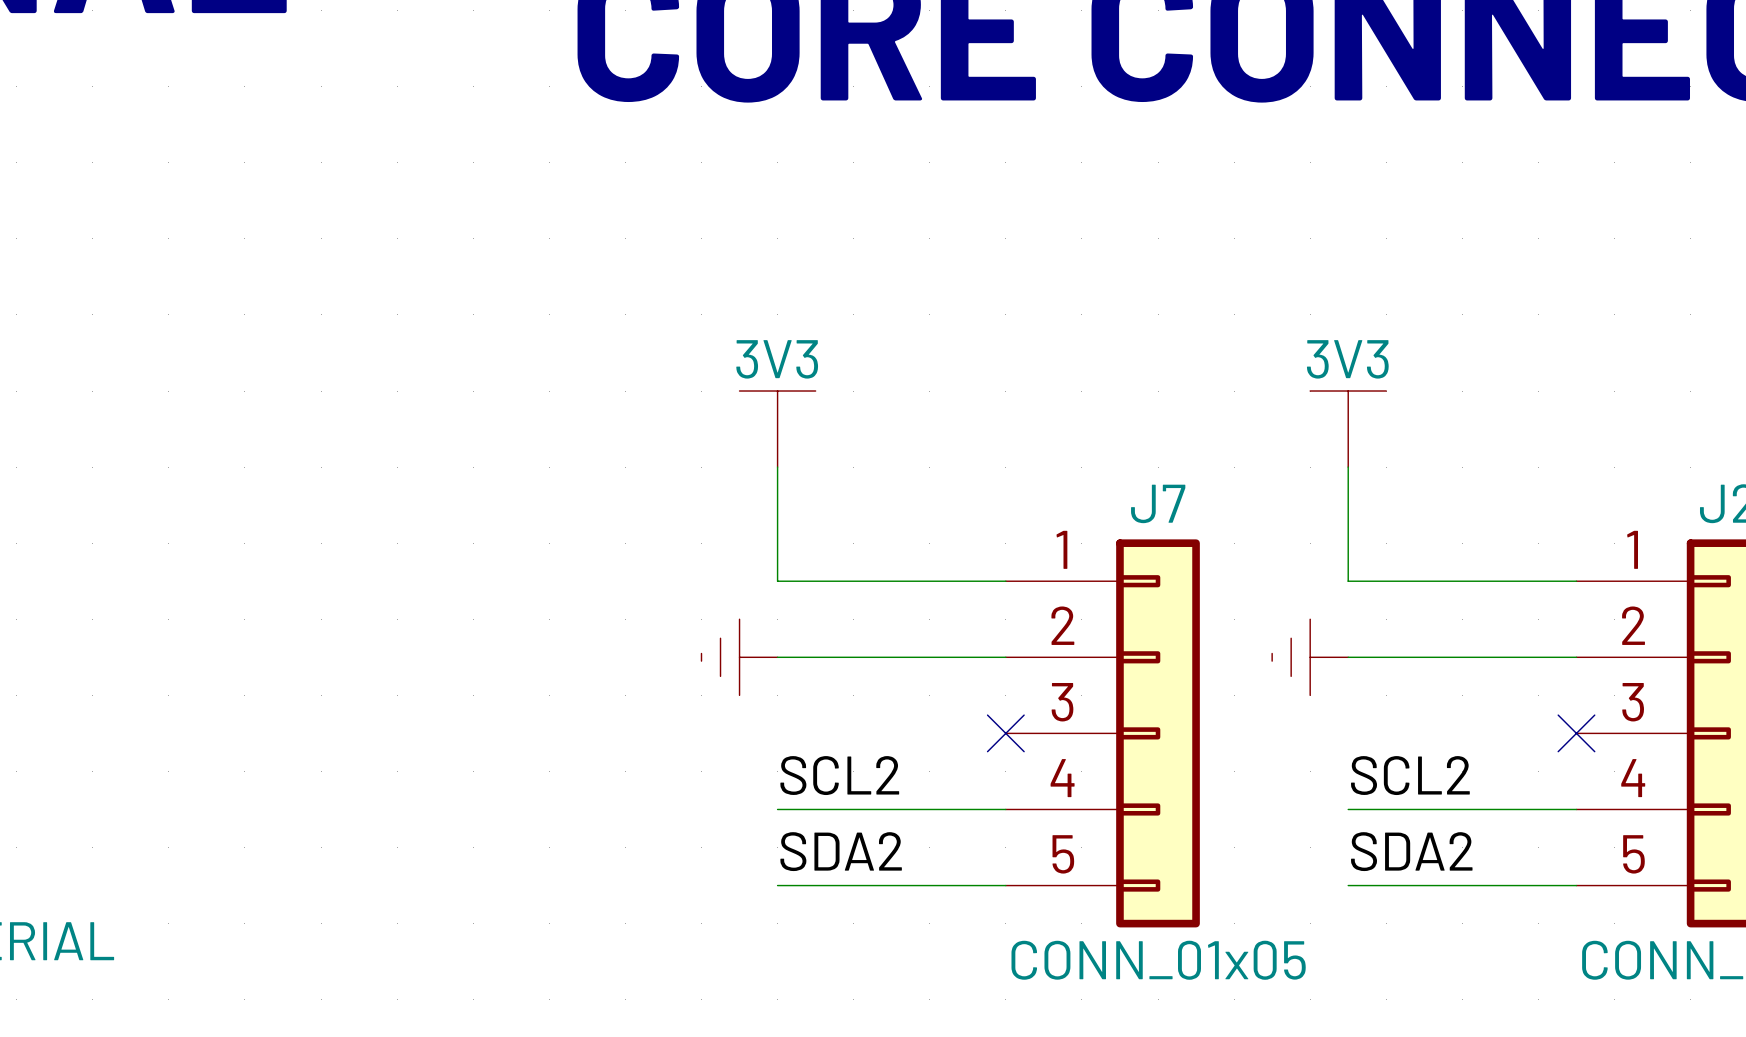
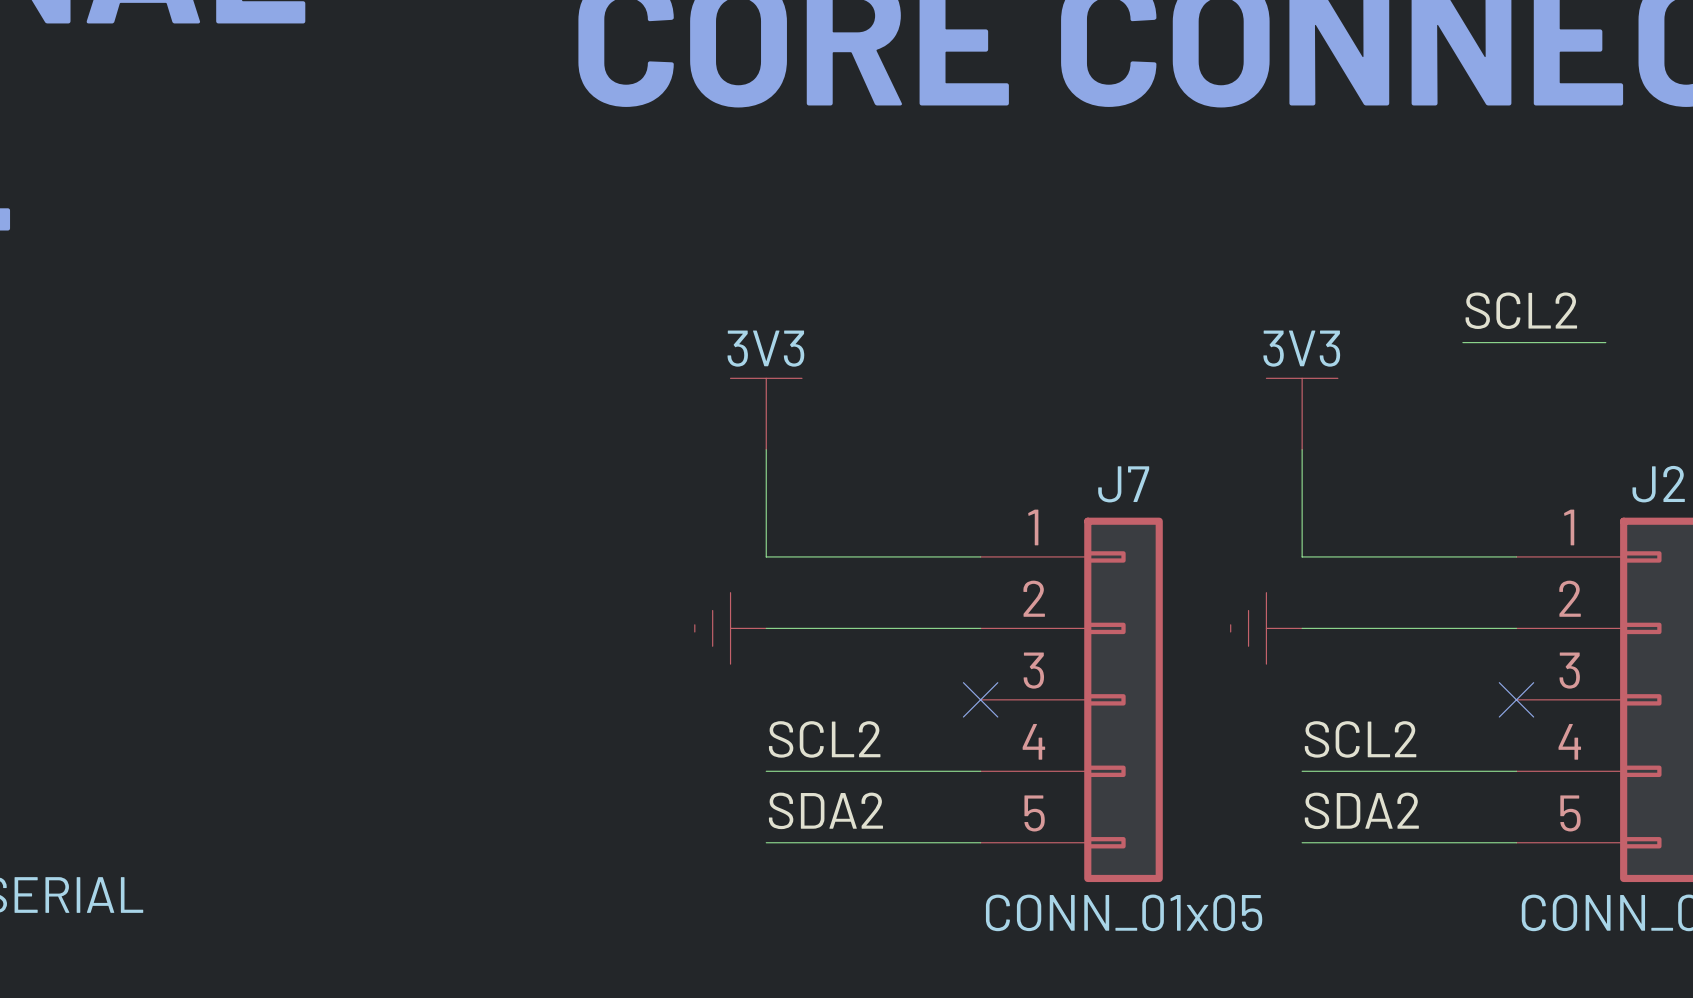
label: none -> SCL2 (1521, 310)
wire: none -> (1462, 342) (1605, 342)

